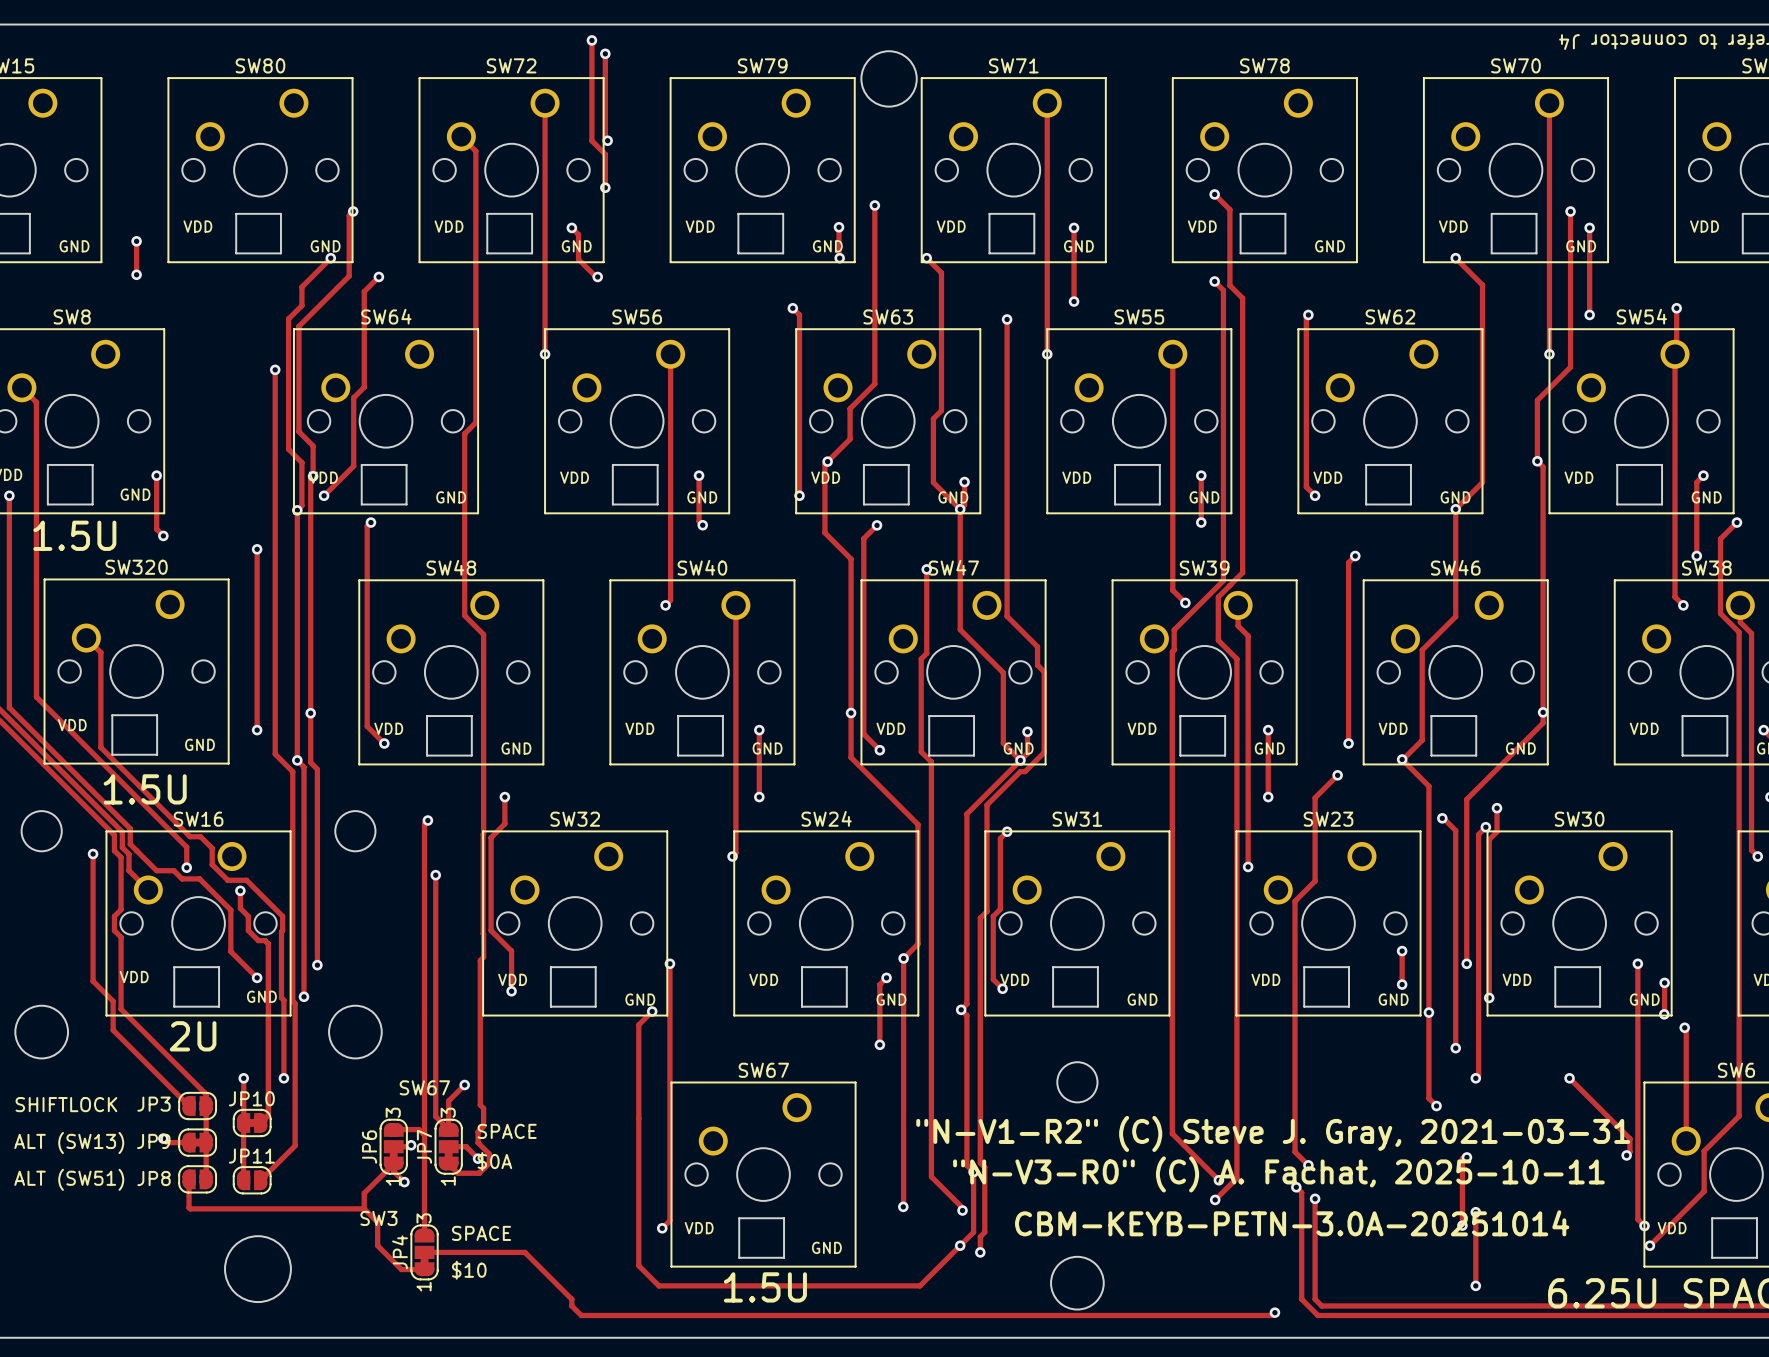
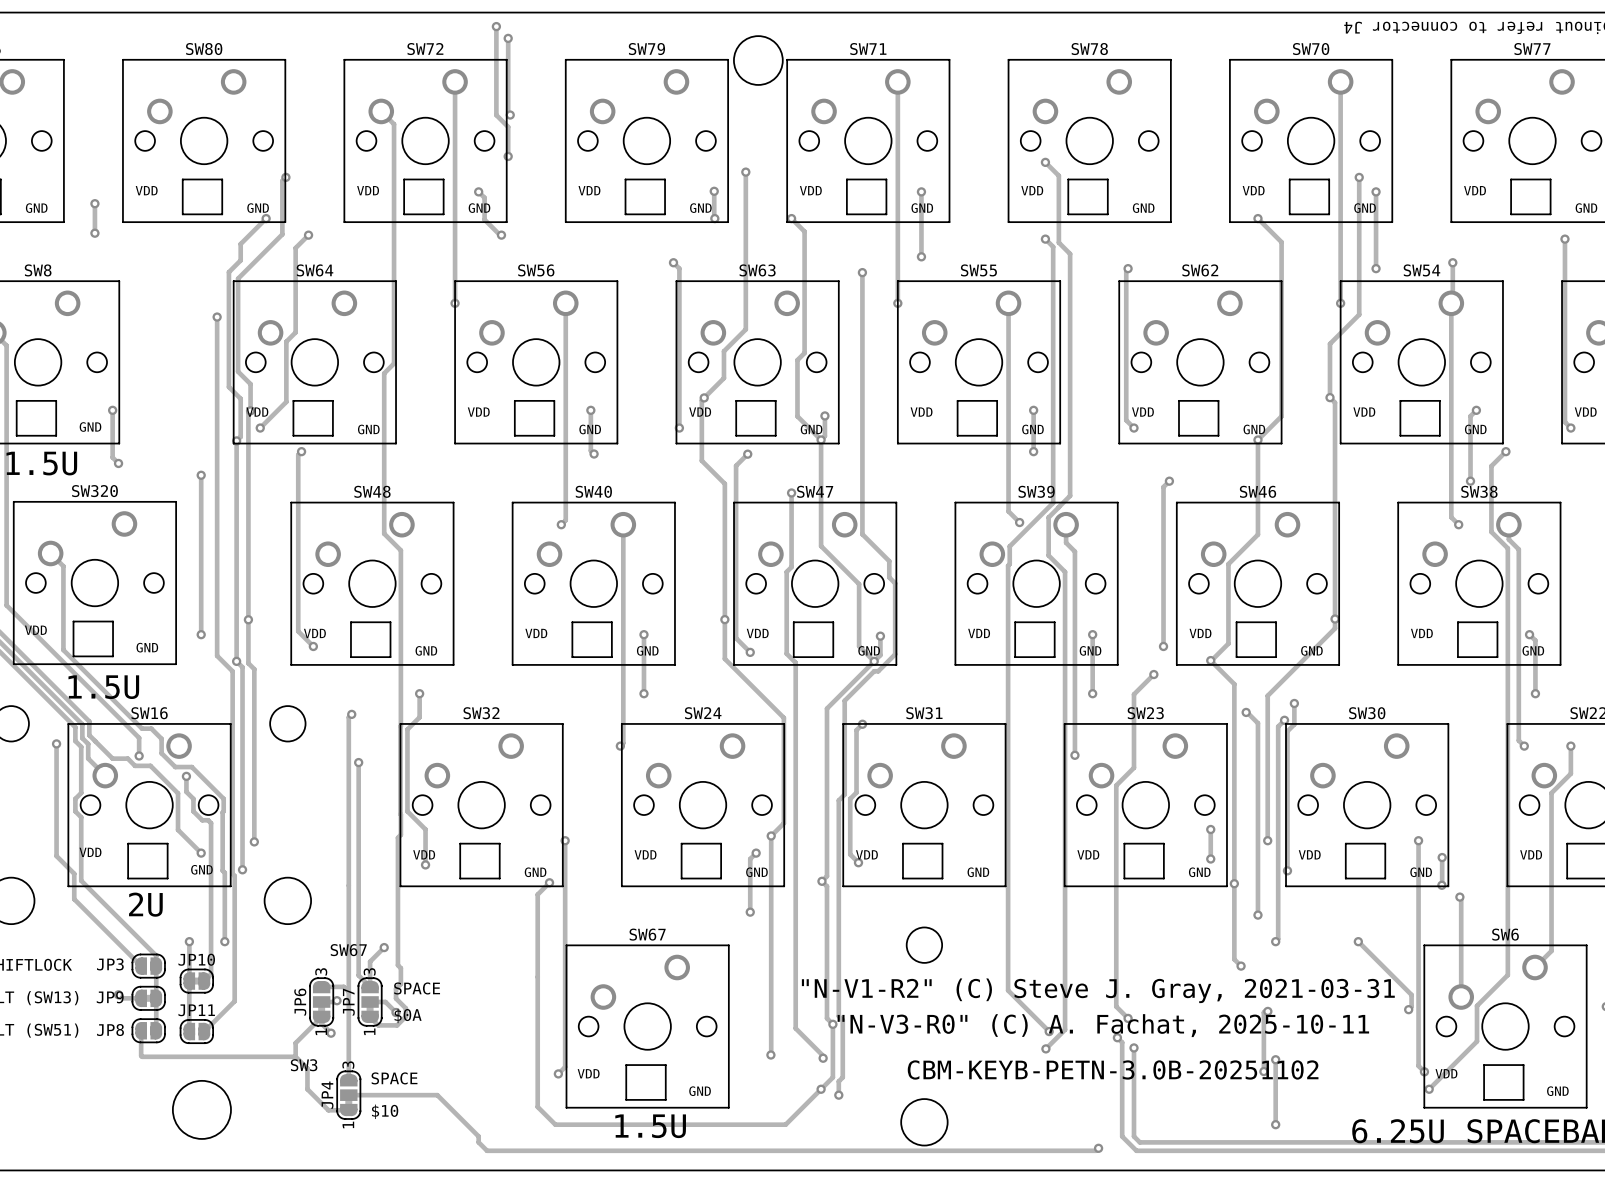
text: CBM-KEYB-PETN-3.0A-20251014 (1292, 1223) -> CBM-KEYB-PETN-3.0B-20251102 (1113, 1069)

